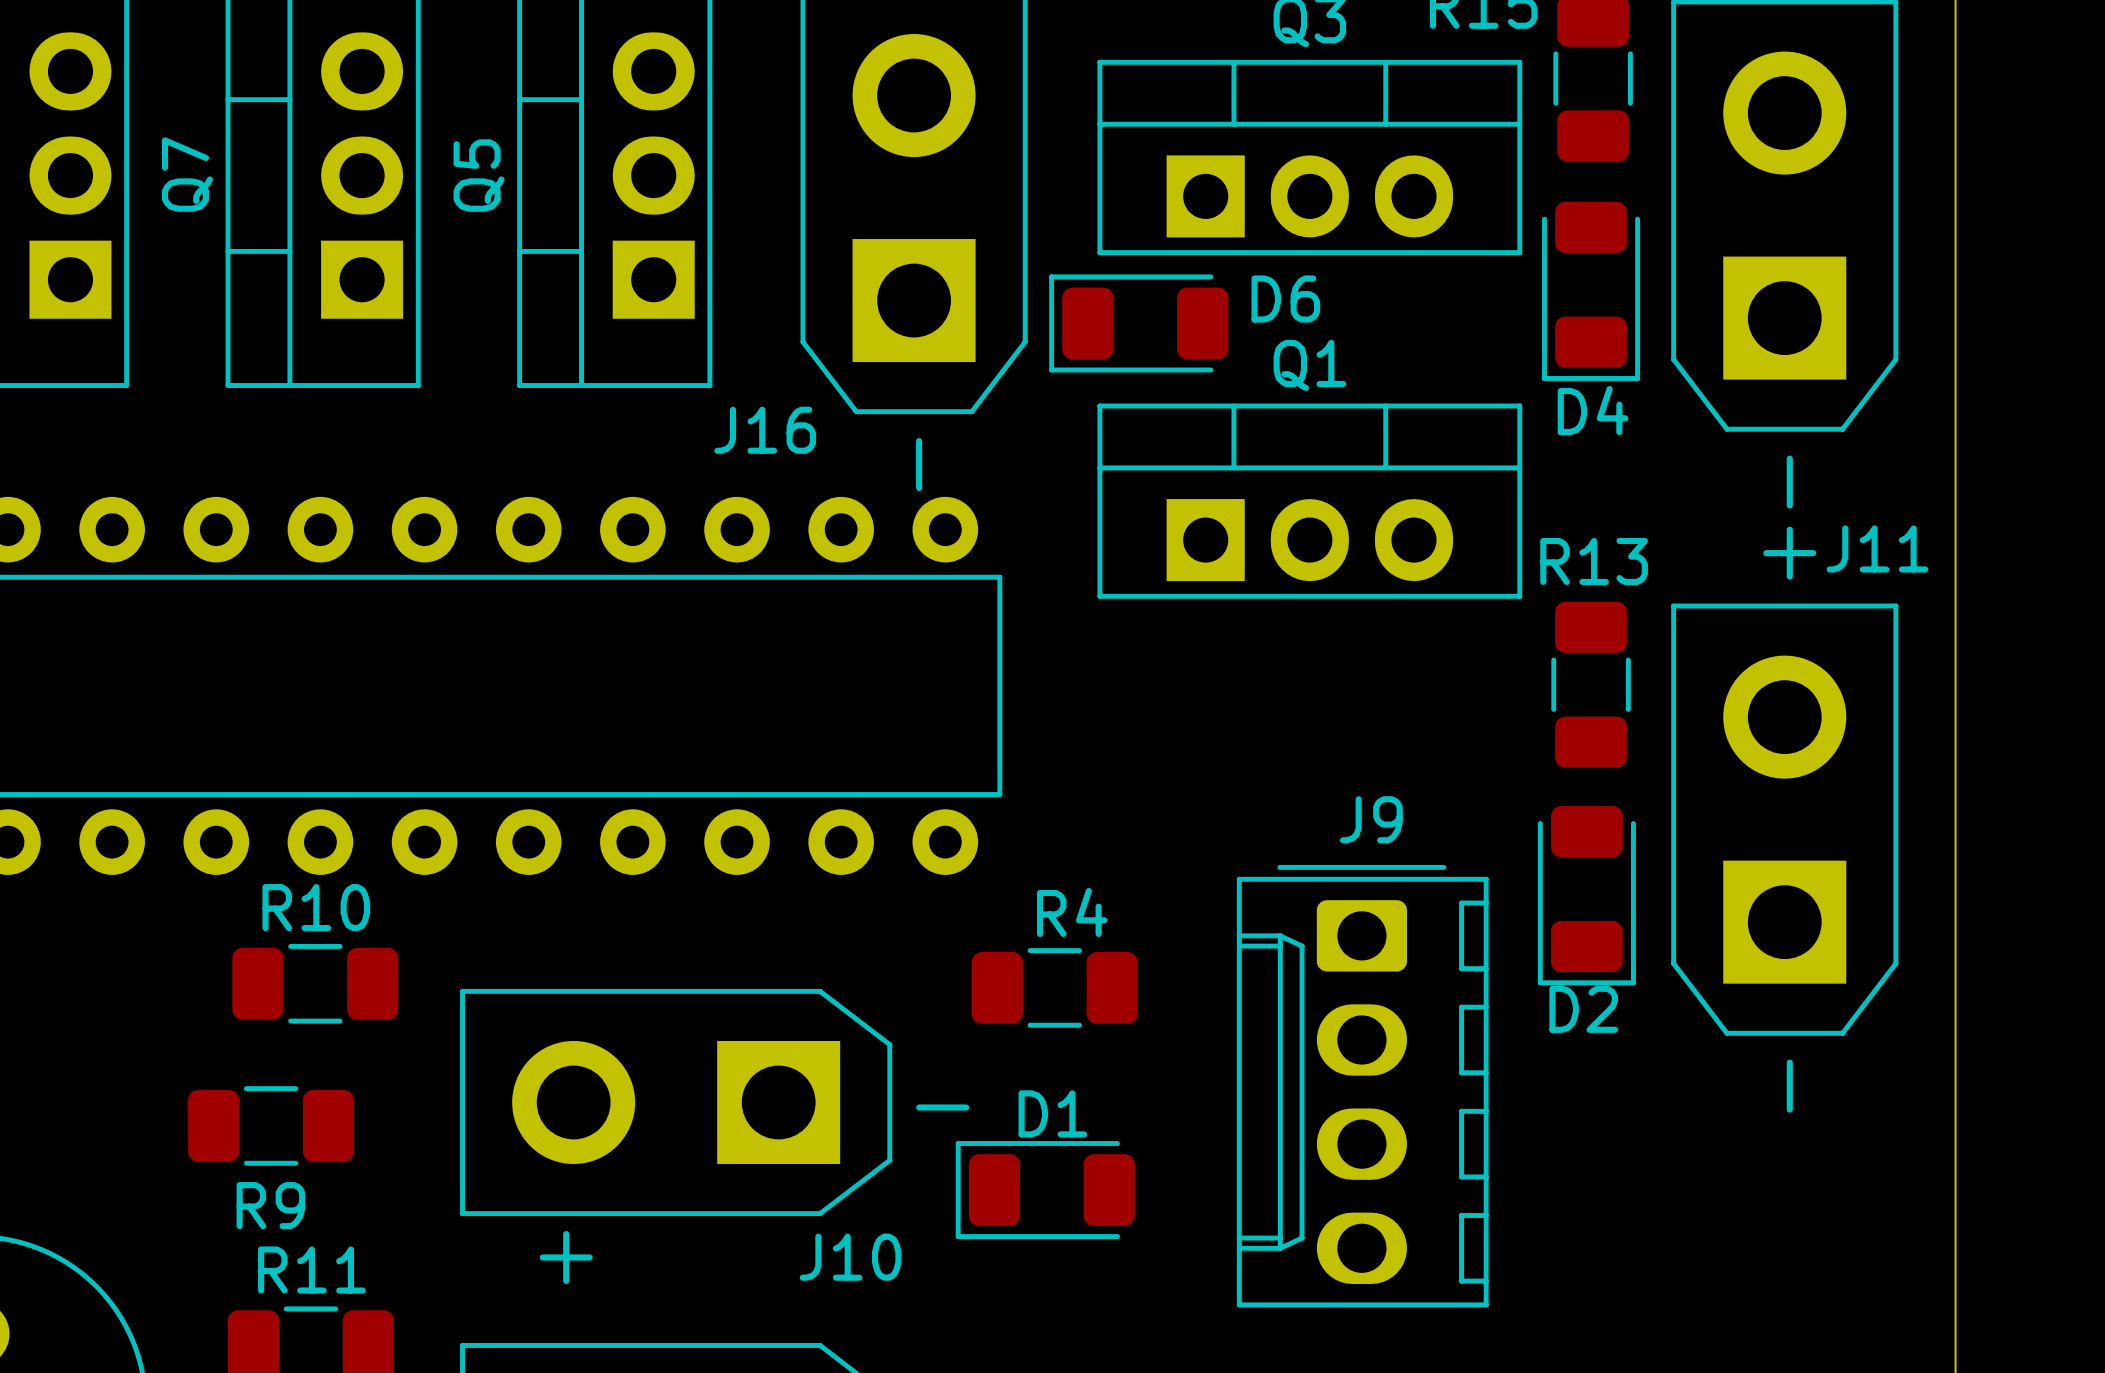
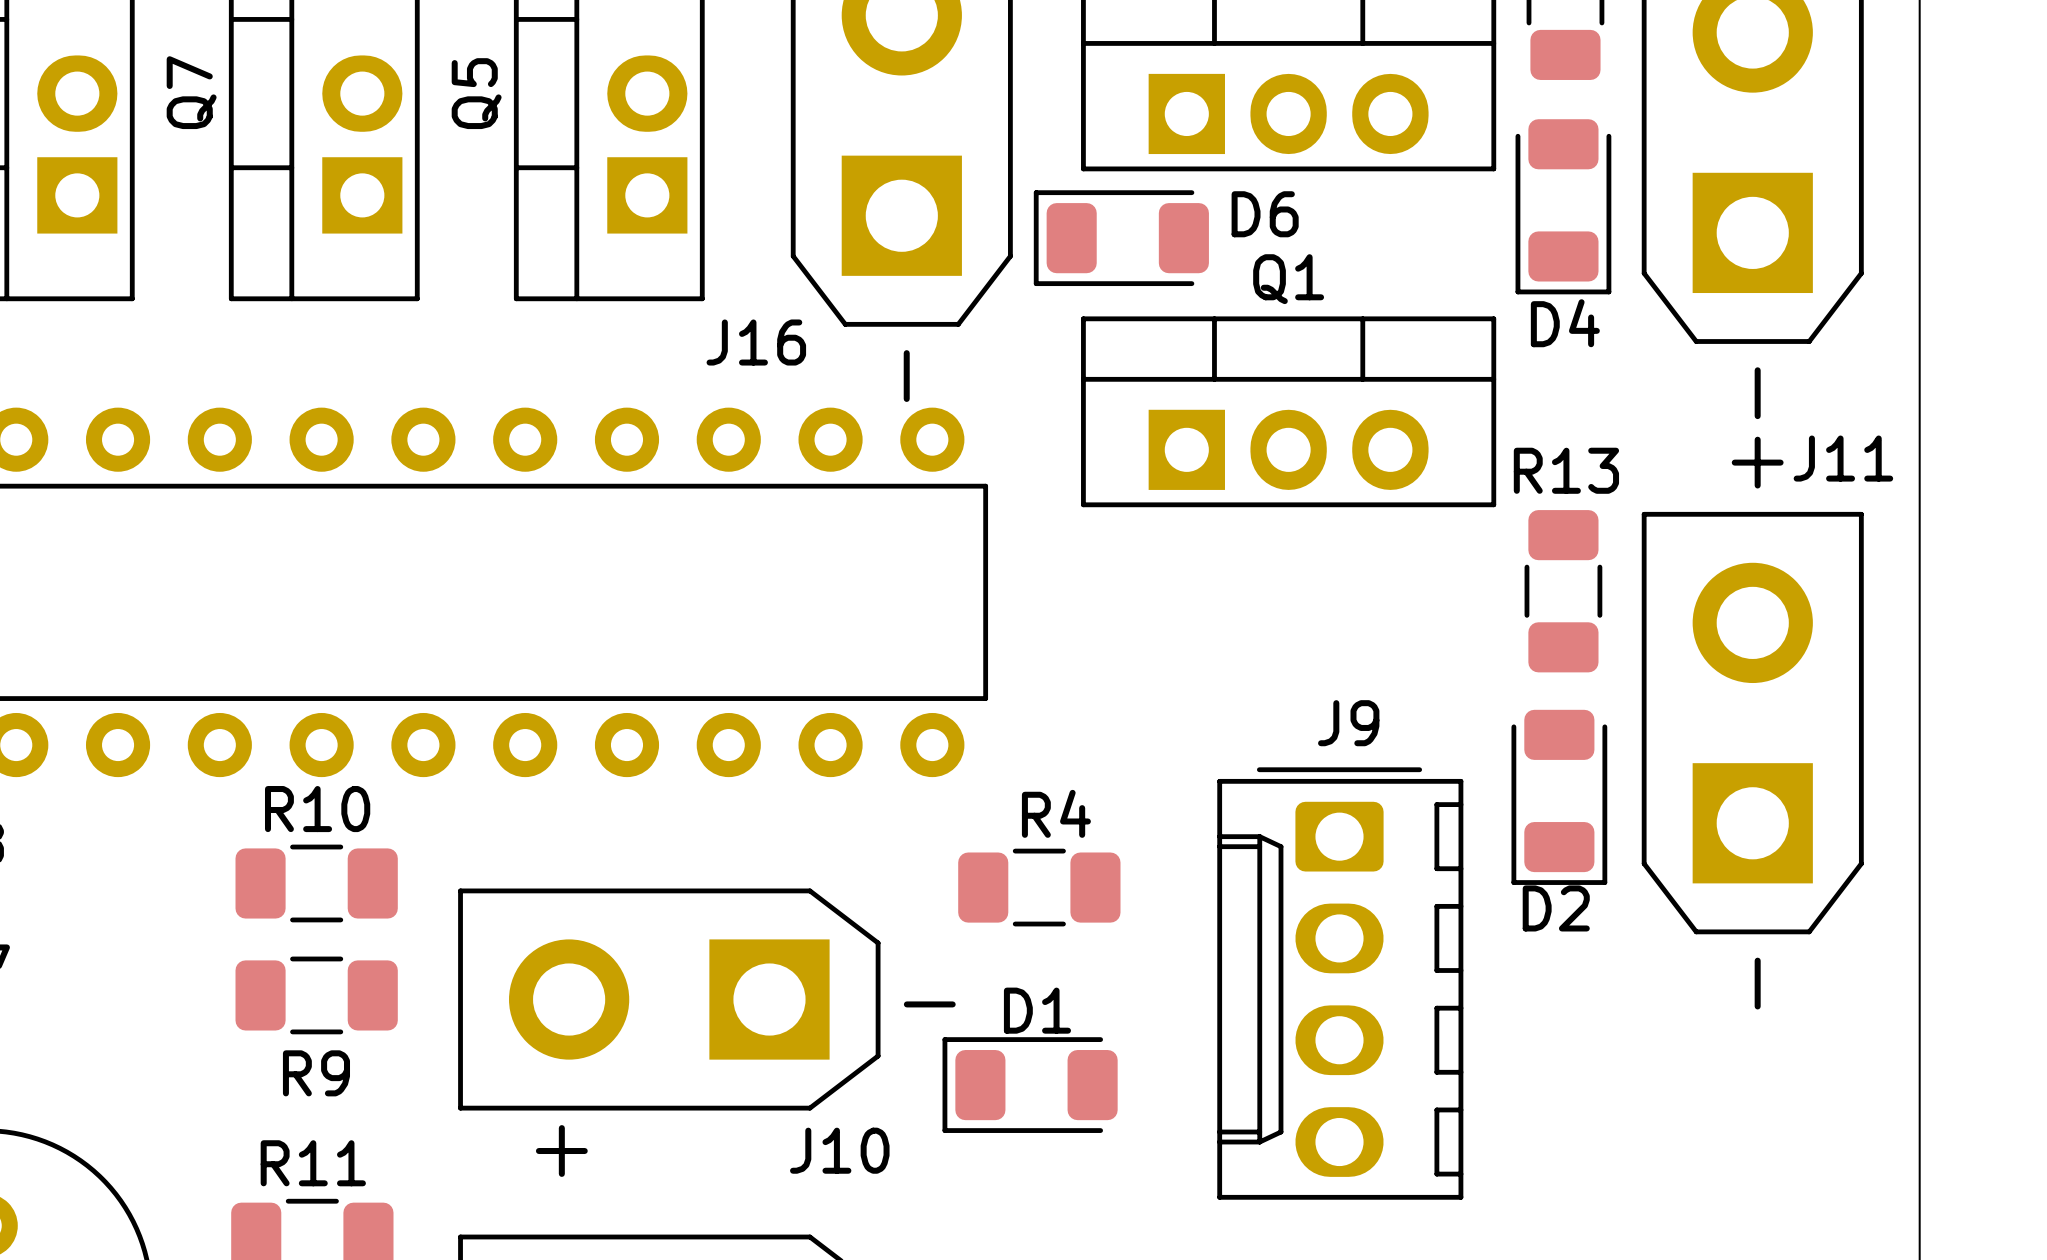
R9 position: (271, 1125) -> (316, 995)

